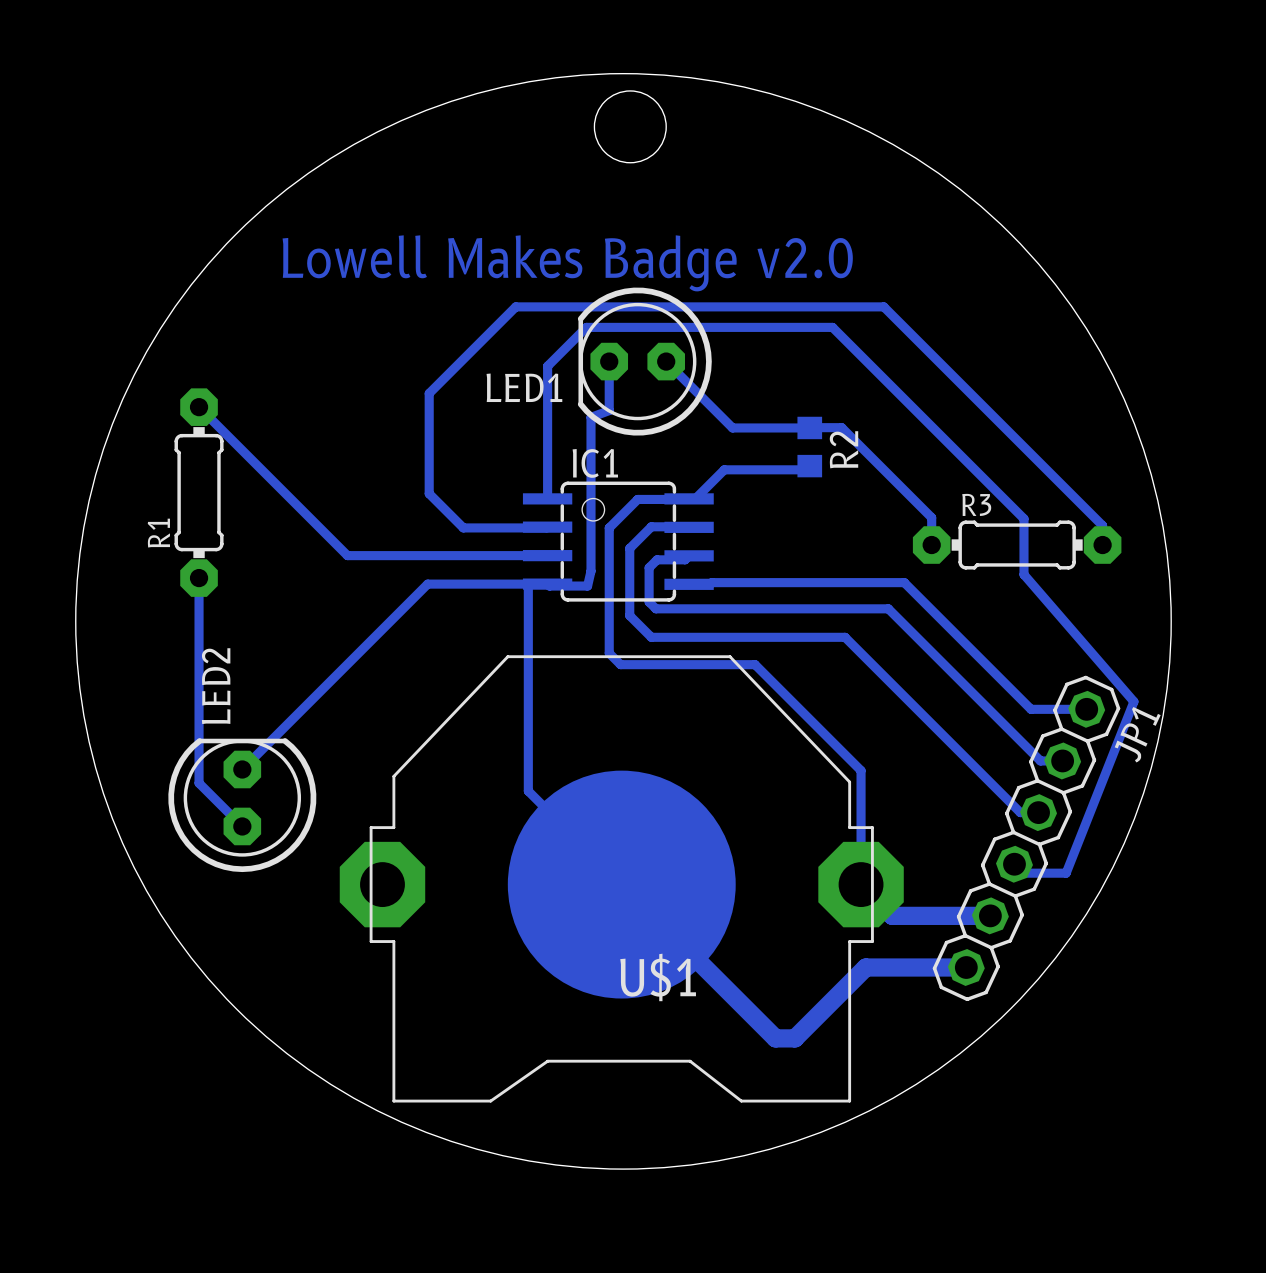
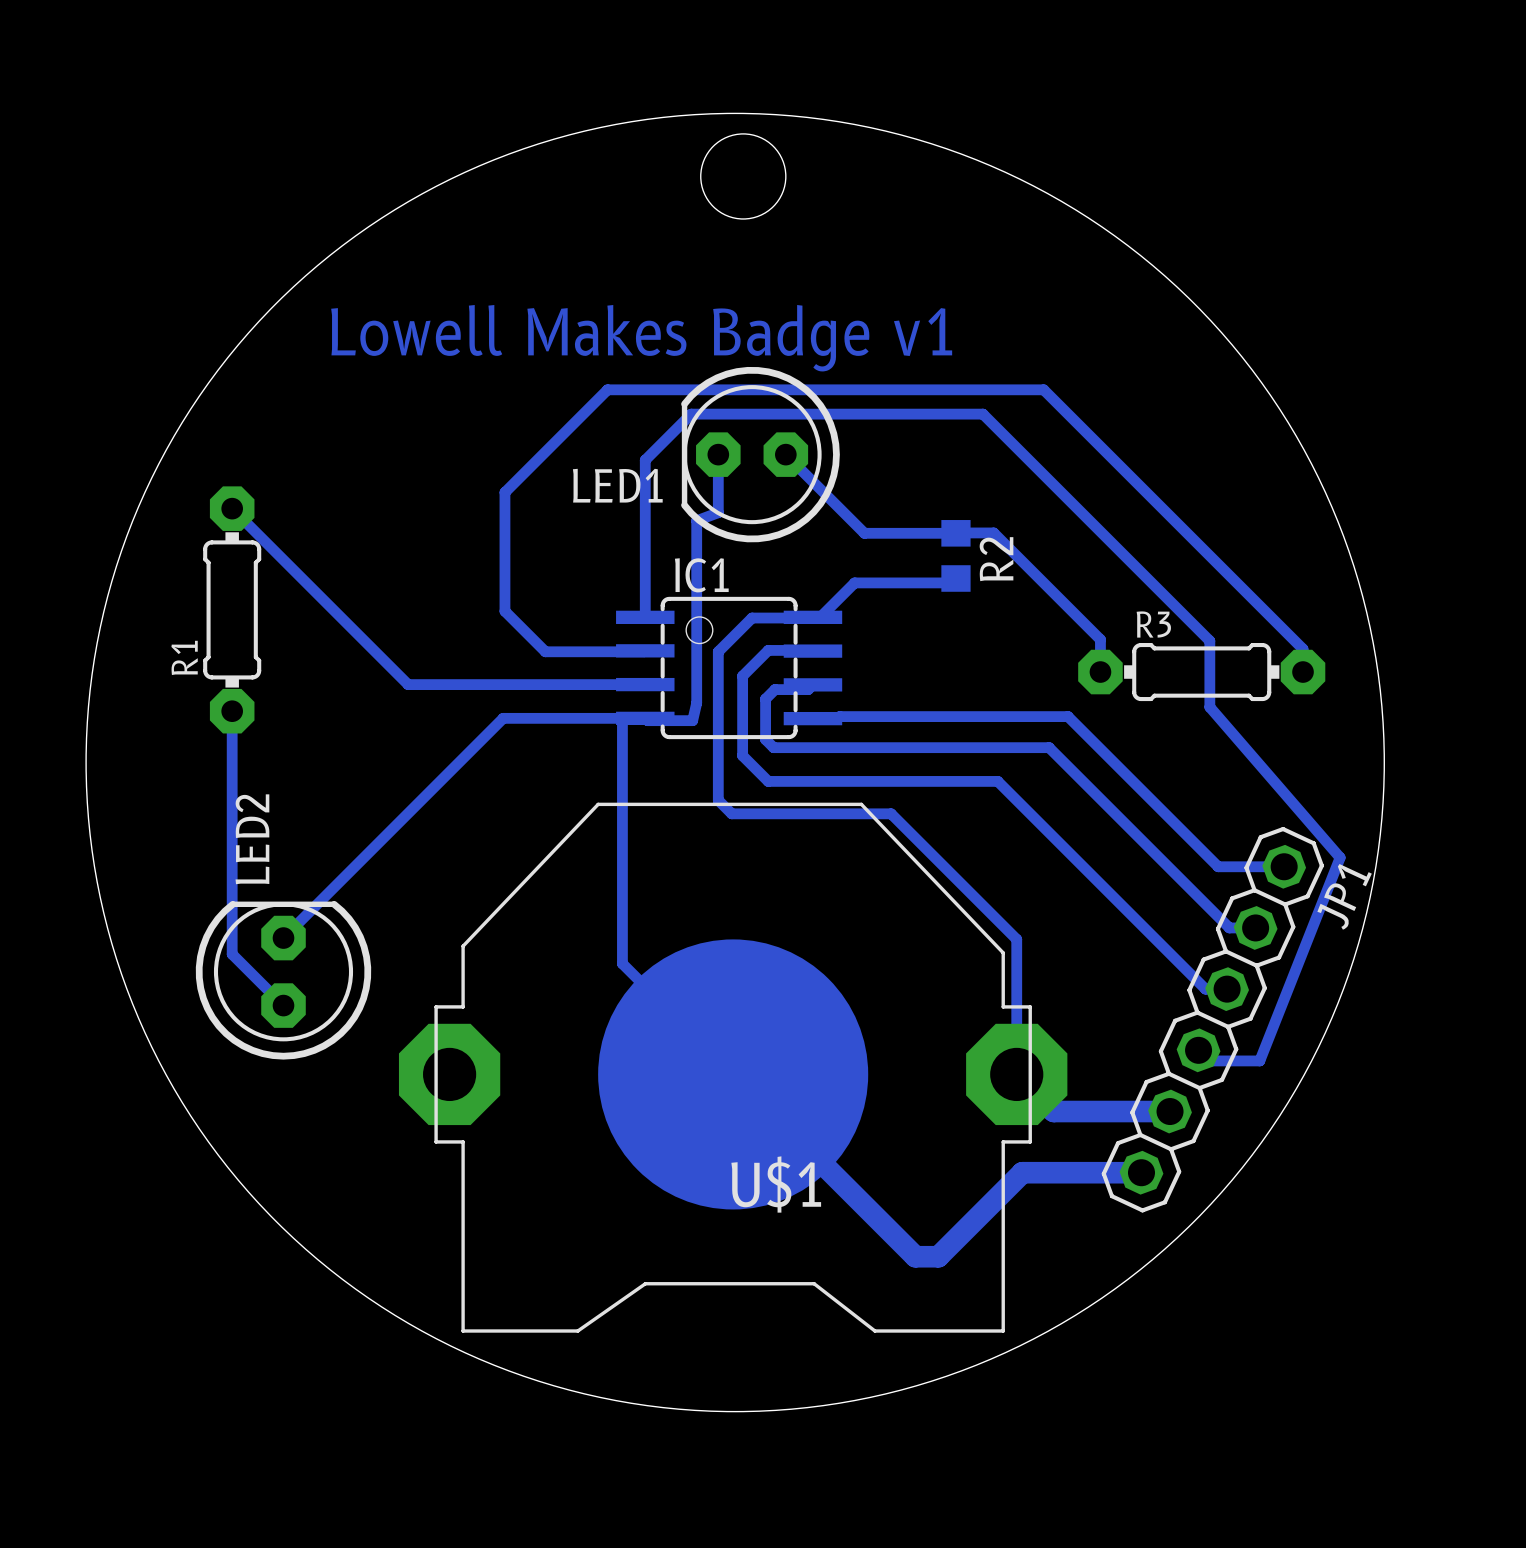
text: Lowell Makes Badge v2.0 (567, 263) -> Lowell Makes Badge v1 (641, 338)

